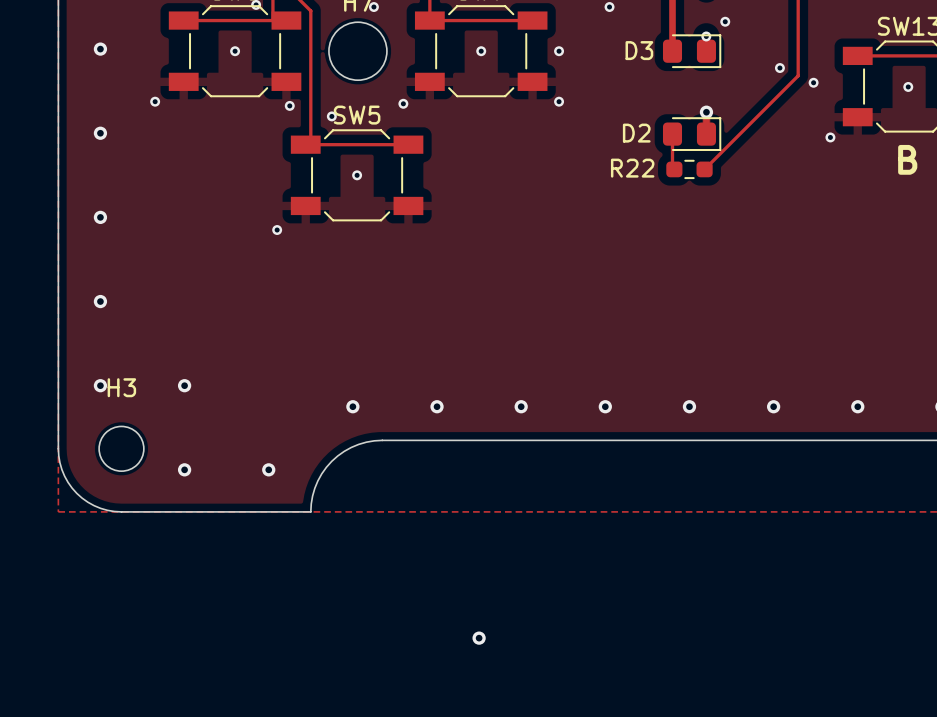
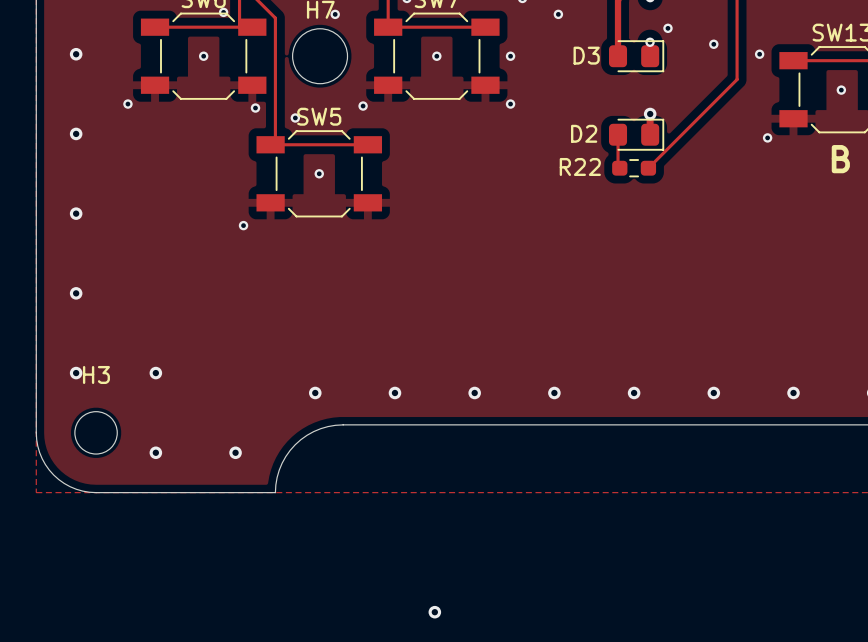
via: none -> (713, 44)
via: none -> (759, 54)
via: (779, 68) -> none
via: (813, 82) -> none

